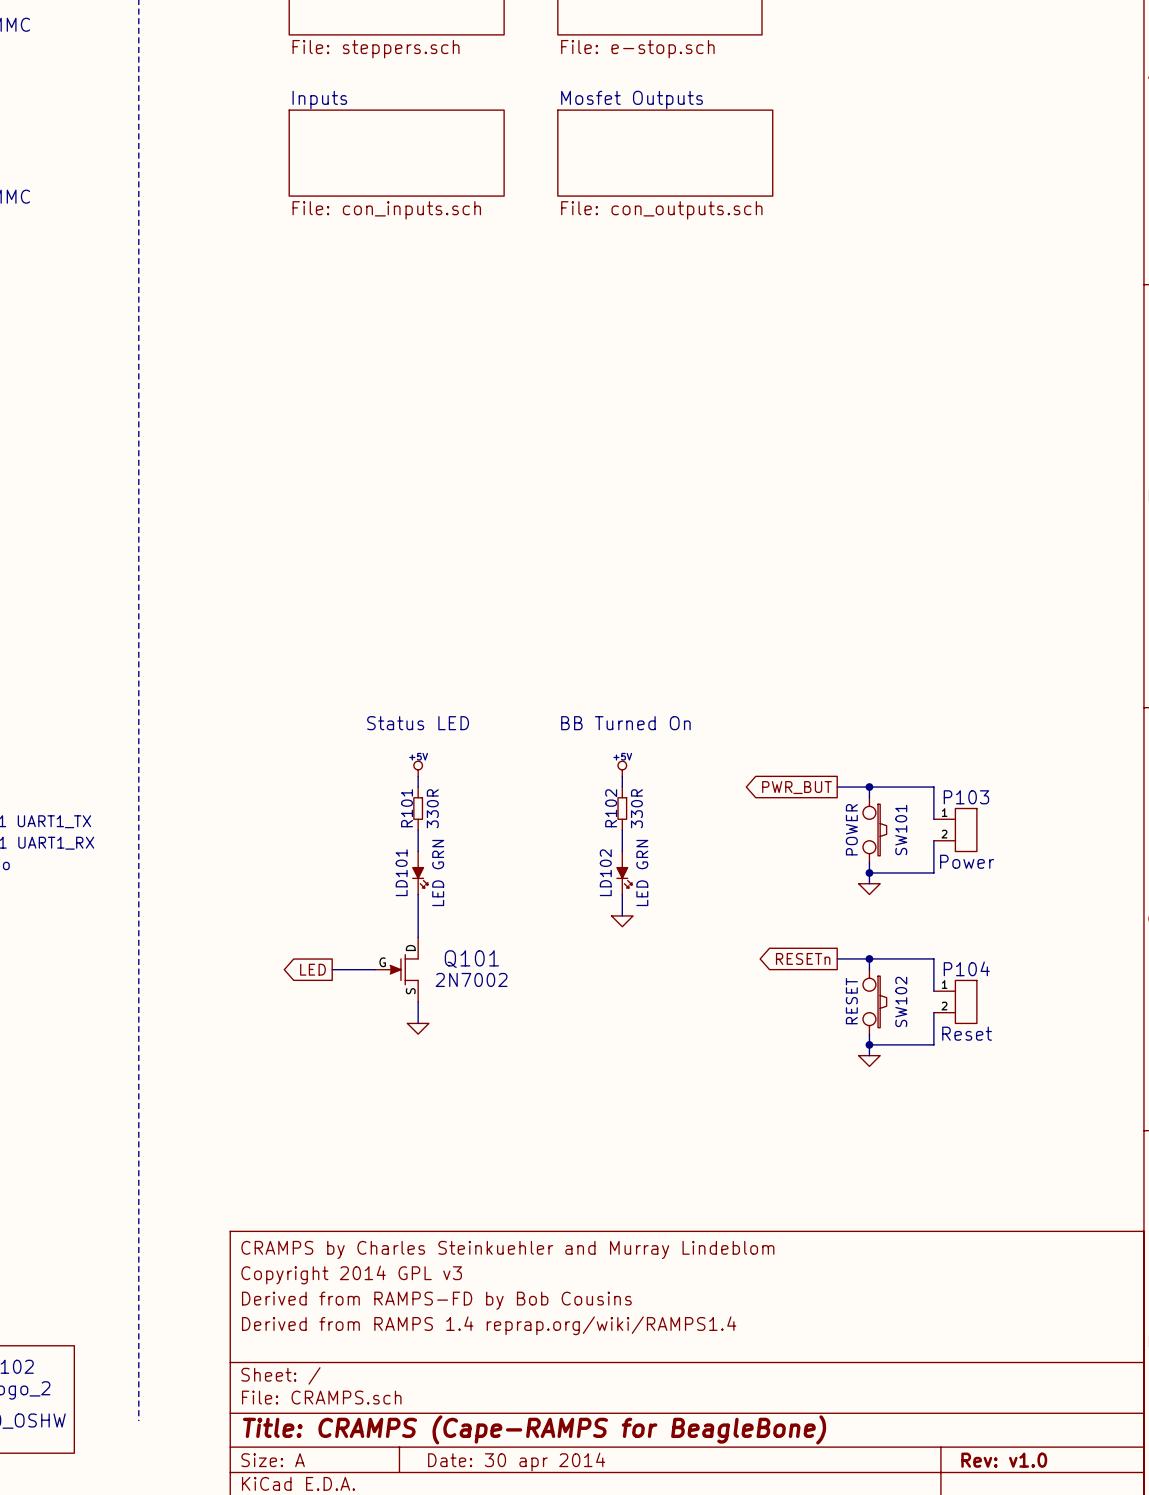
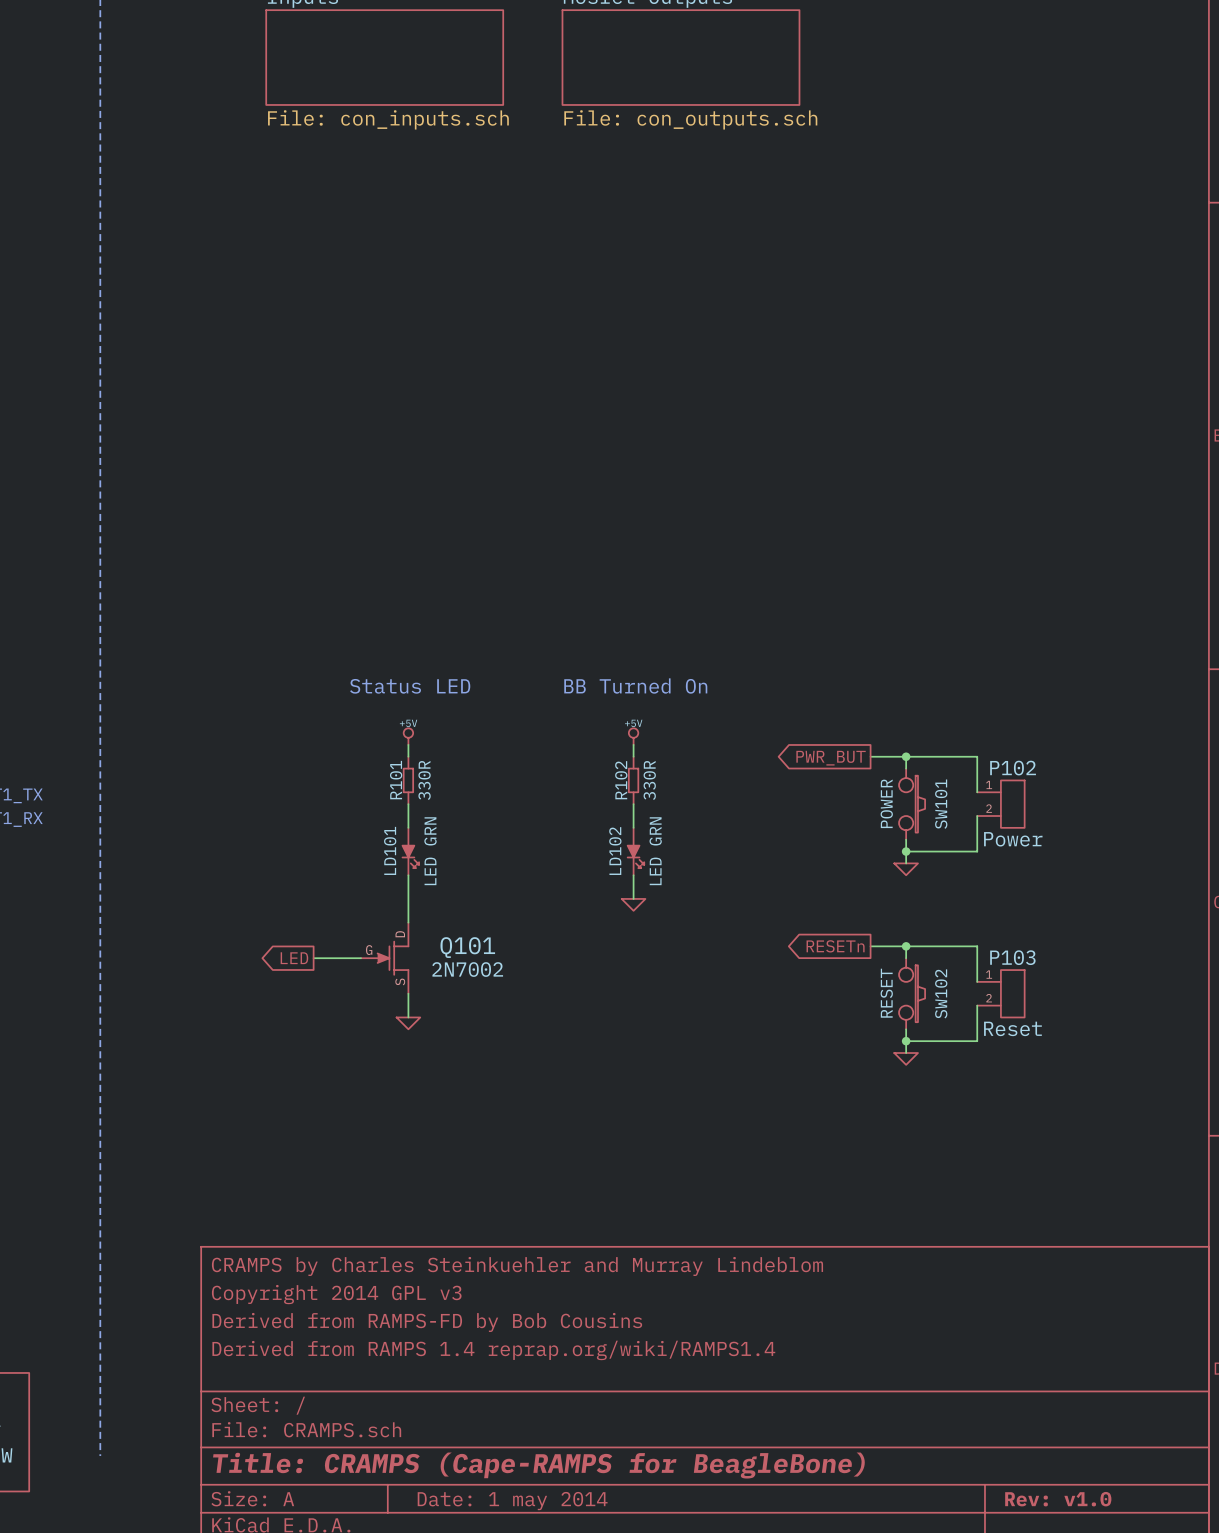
P103 name: P103 (966, 797) -> P102 (1013, 768)
P104 name: P104 (966, 968) -> P103 (1012, 957)
title block: Date: 30 apr 2014 (516, 1461) -> Date: 1 may 2014 (512, 1501)

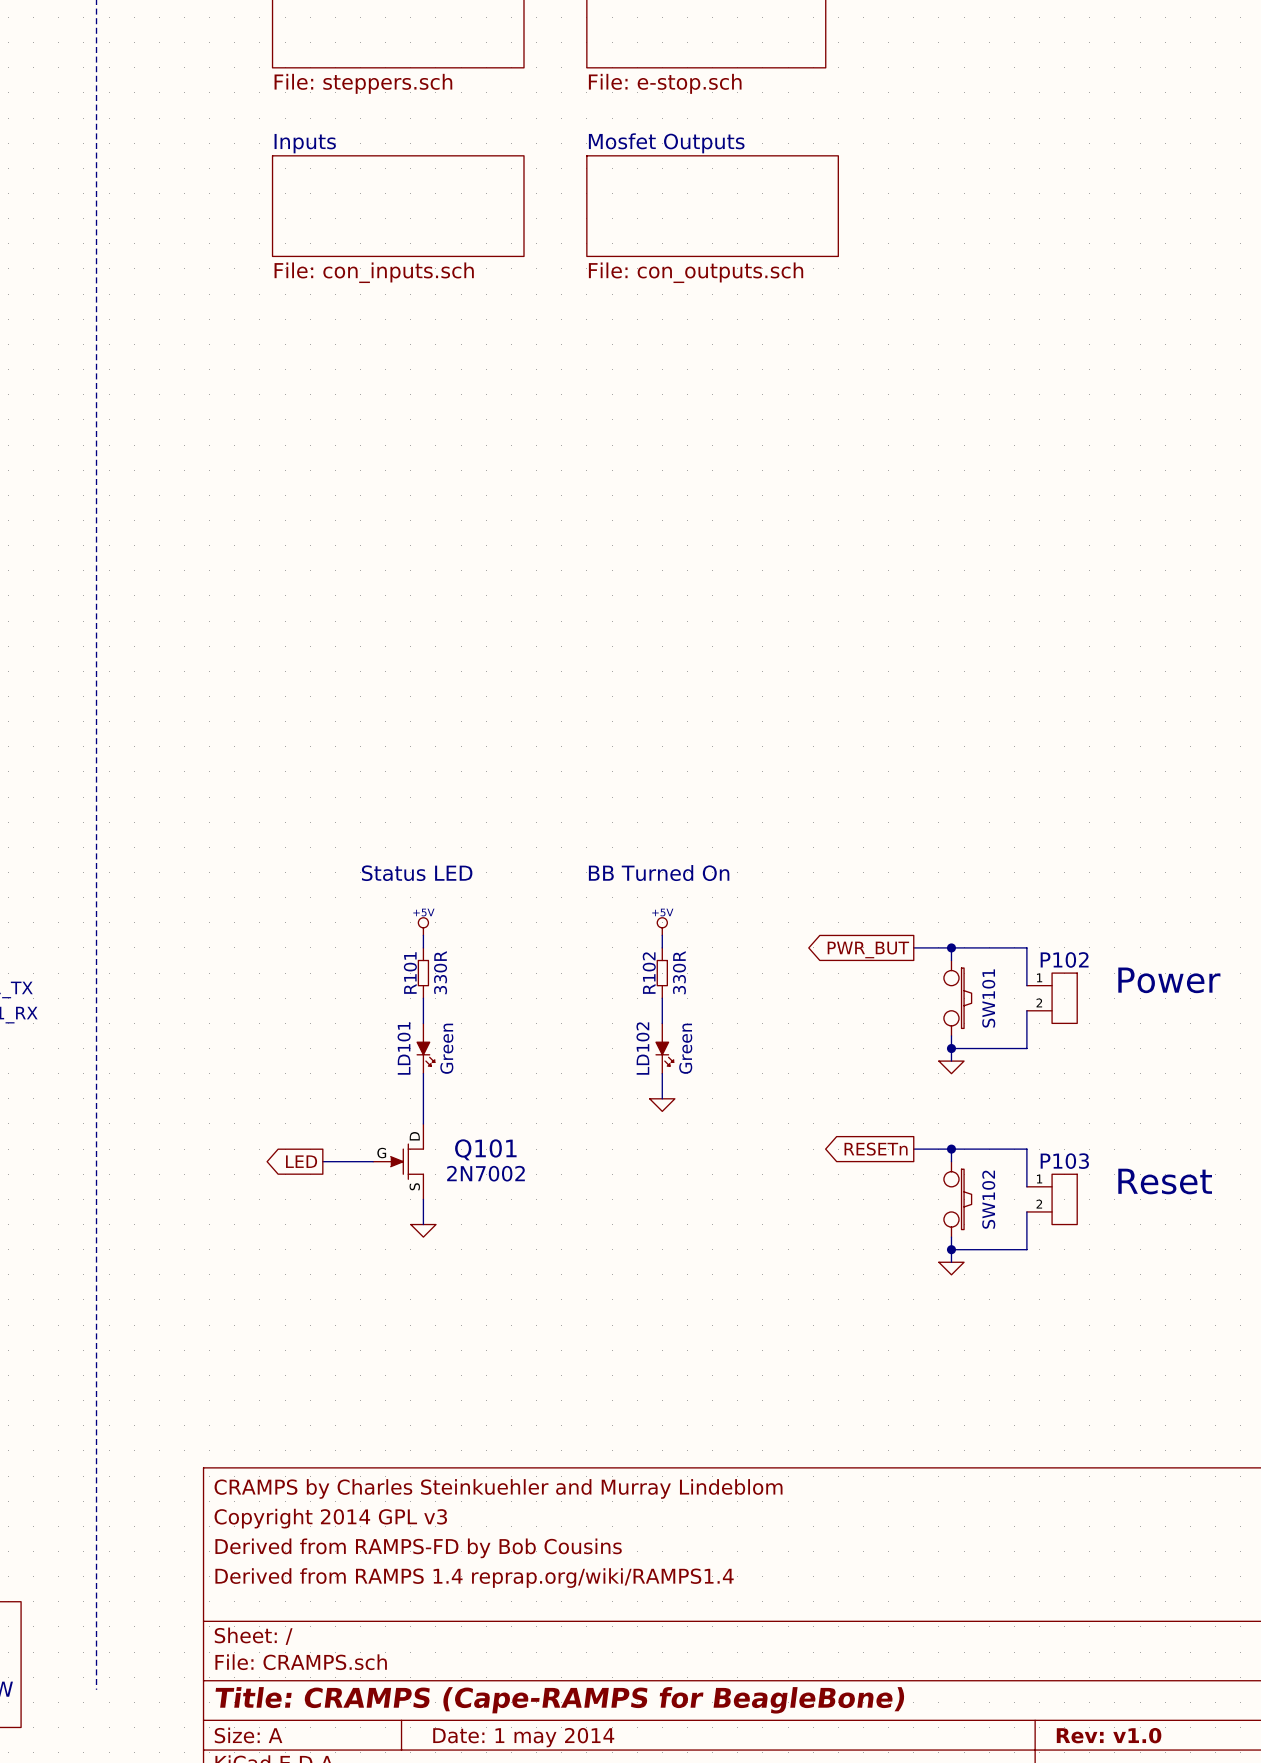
text: none -> Power (1169, 980)
SW101 value: POWER (886, 803) -> none
P102 value: Power (1013, 839) -> none
LD101 value: LED GRN (430, 851) -> Green (446, 1048)
LD102 value: LED GRN (655, 851) -> Green (685, 1048)
text: none -> Reset (1165, 1181)
SW102 value: RESET (886, 993) -> none
P103 value: Reset (1012, 1028) -> none

